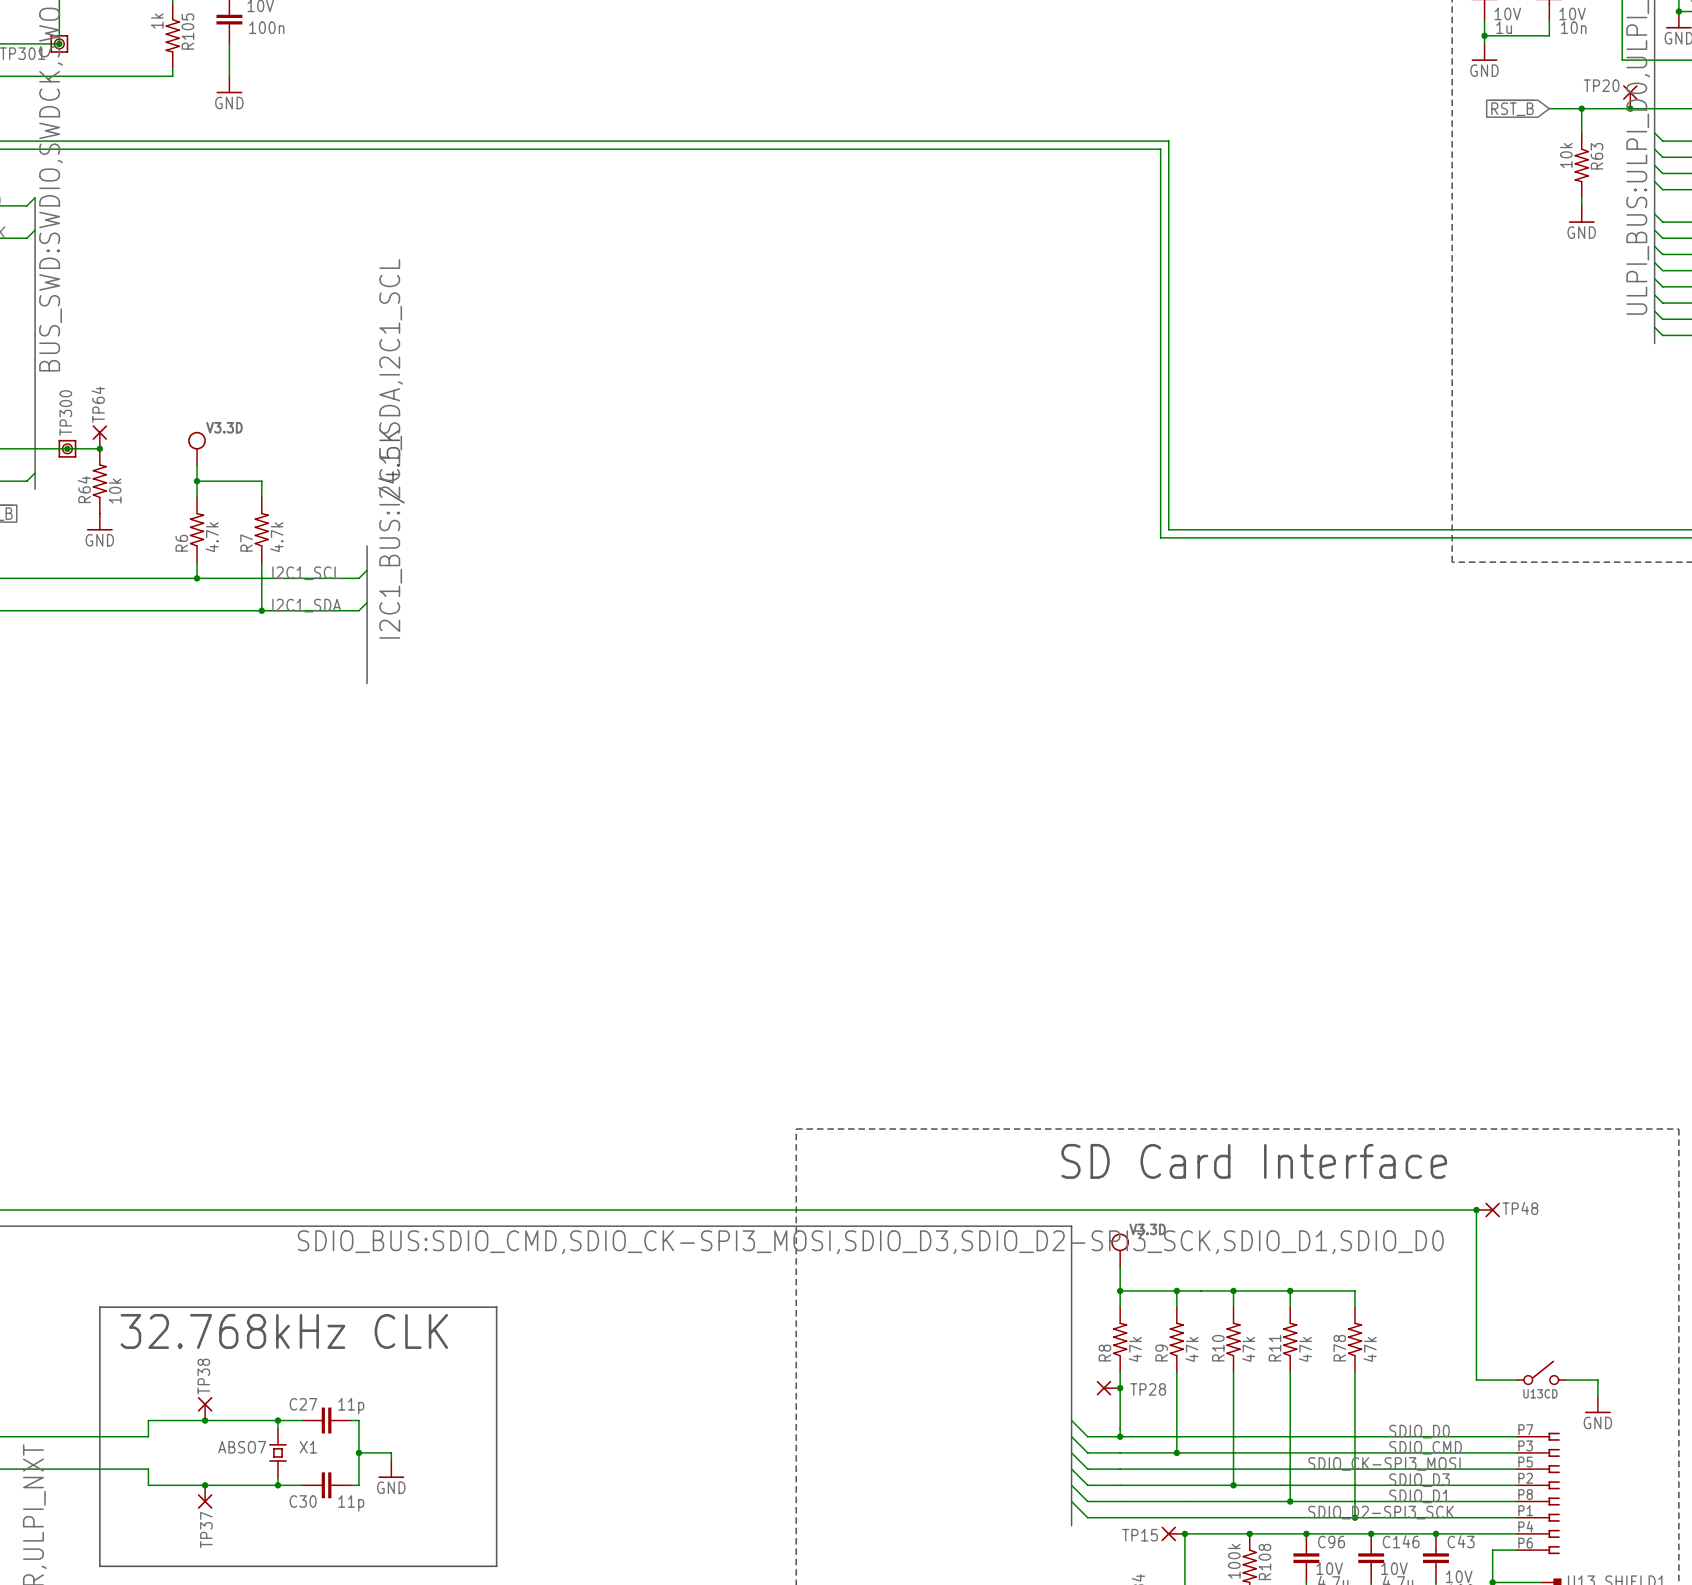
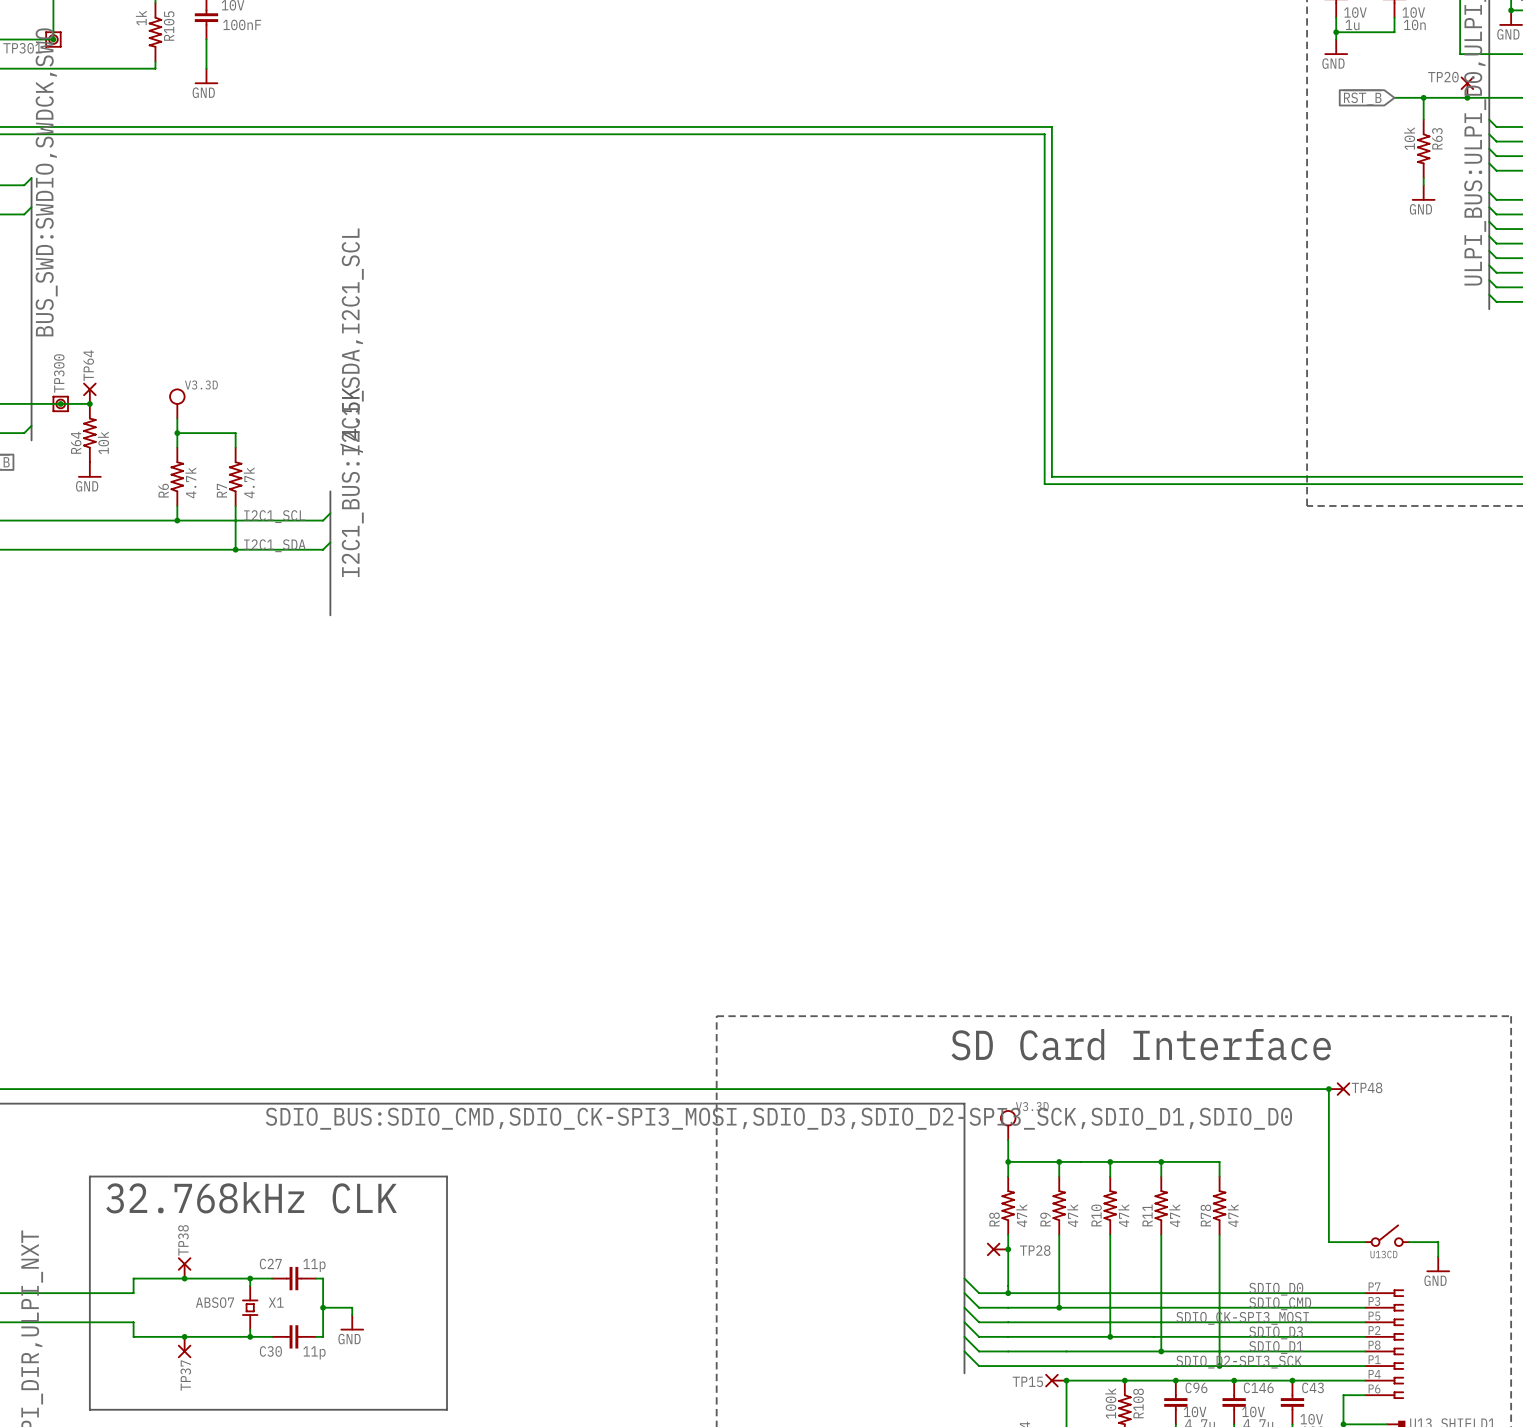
part value: 100n (266, 27) -> 100nF (242, 24)

